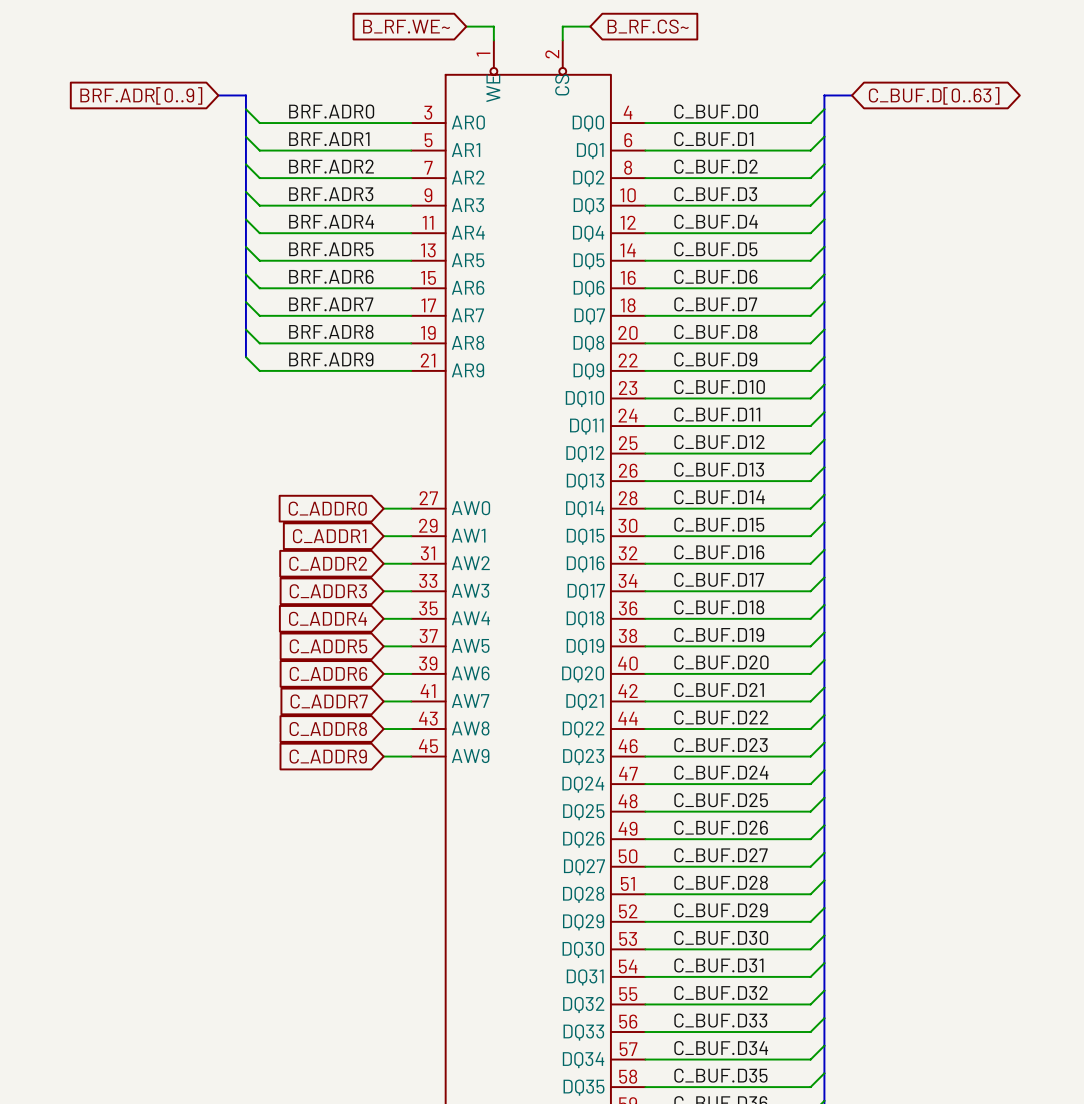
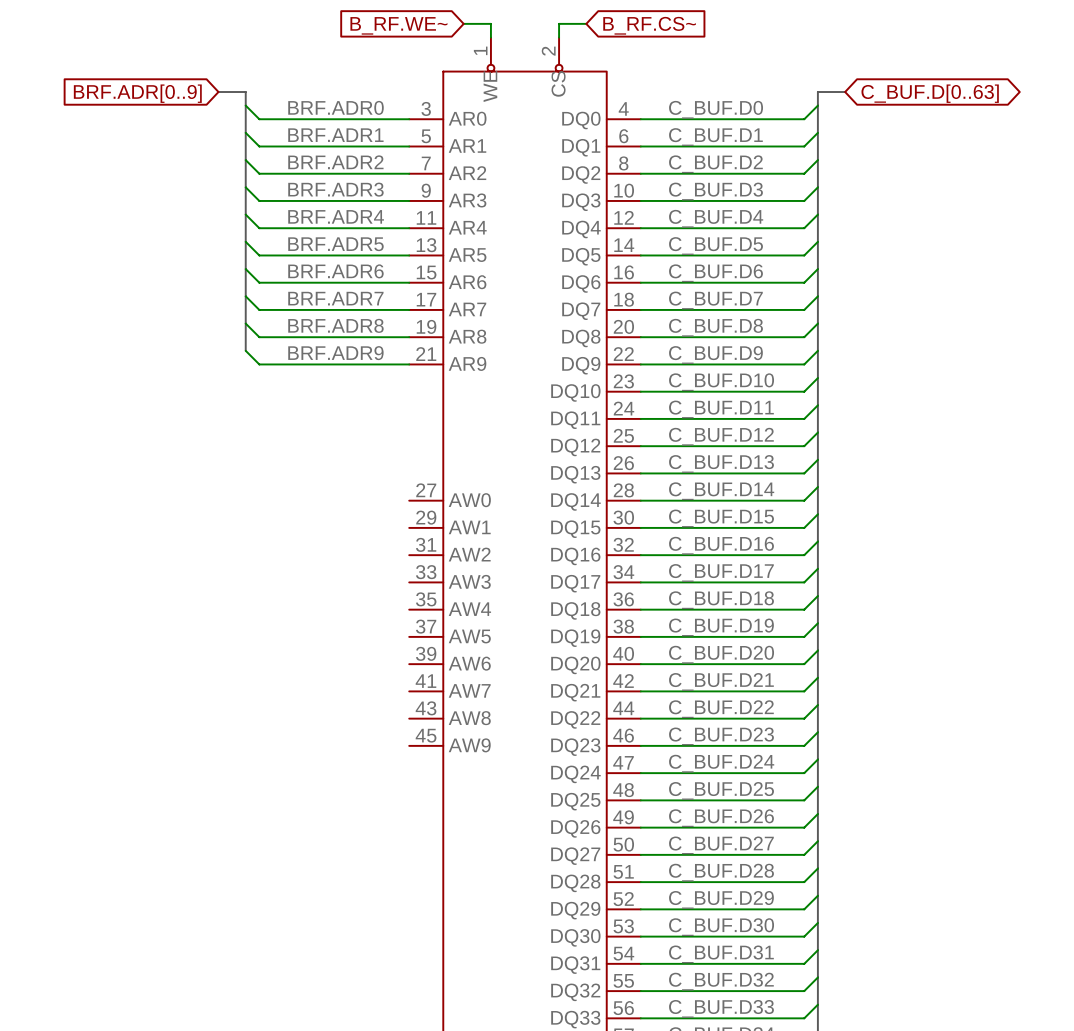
global label: C_ADDR0 (327, 508) -> none
wire: (383, 508) (411, 508) -> none
global label: C_ADDR1 (329, 536) -> none
wire: (383, 536) (411, 536) -> none
global label: C_ADDR2 (328, 563) -> none
wire: (383, 563) (411, 563) -> none
global label: C_ADDR3 (328, 591) -> none
wire: (383, 591) (411, 591) -> none
global label: C_ADDR4 (328, 618) -> none
wire: (383, 618) (411, 618) -> none
global label: C_ADDR5 (328, 646) -> none
wire: (383, 646) (411, 646) -> none
global label: C_ADDR6 (328, 673) -> none
wire: (383, 673) (411, 673) -> none
global label: C_ADDR7 (329, 701) -> none
wire: (383, 701) (411, 701) -> none
global label: C_ADDR8 (328, 729) -> none
wire: (383, 729) (411, 729) -> none
global label: C_ADDR9 (328, 756) -> none
wire: (383, 756) (411, 756) -> none

